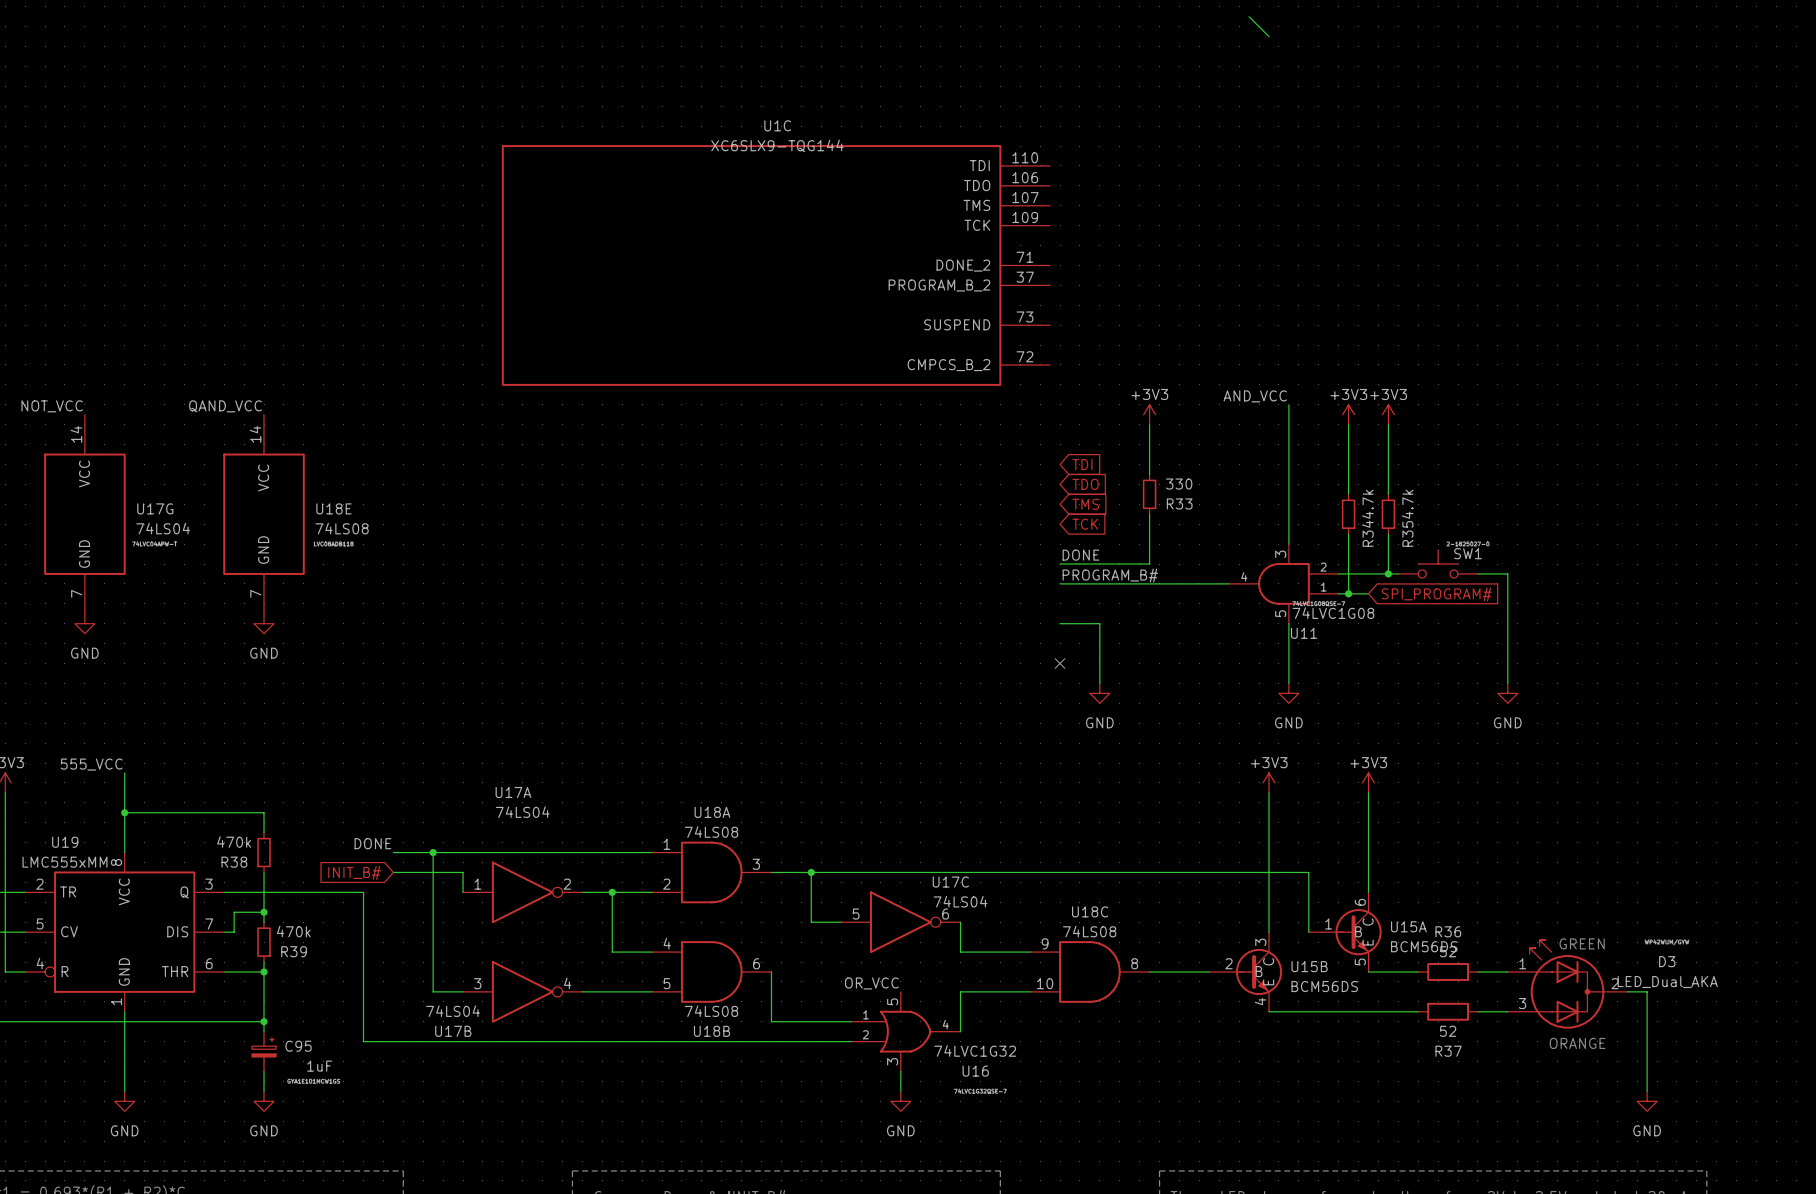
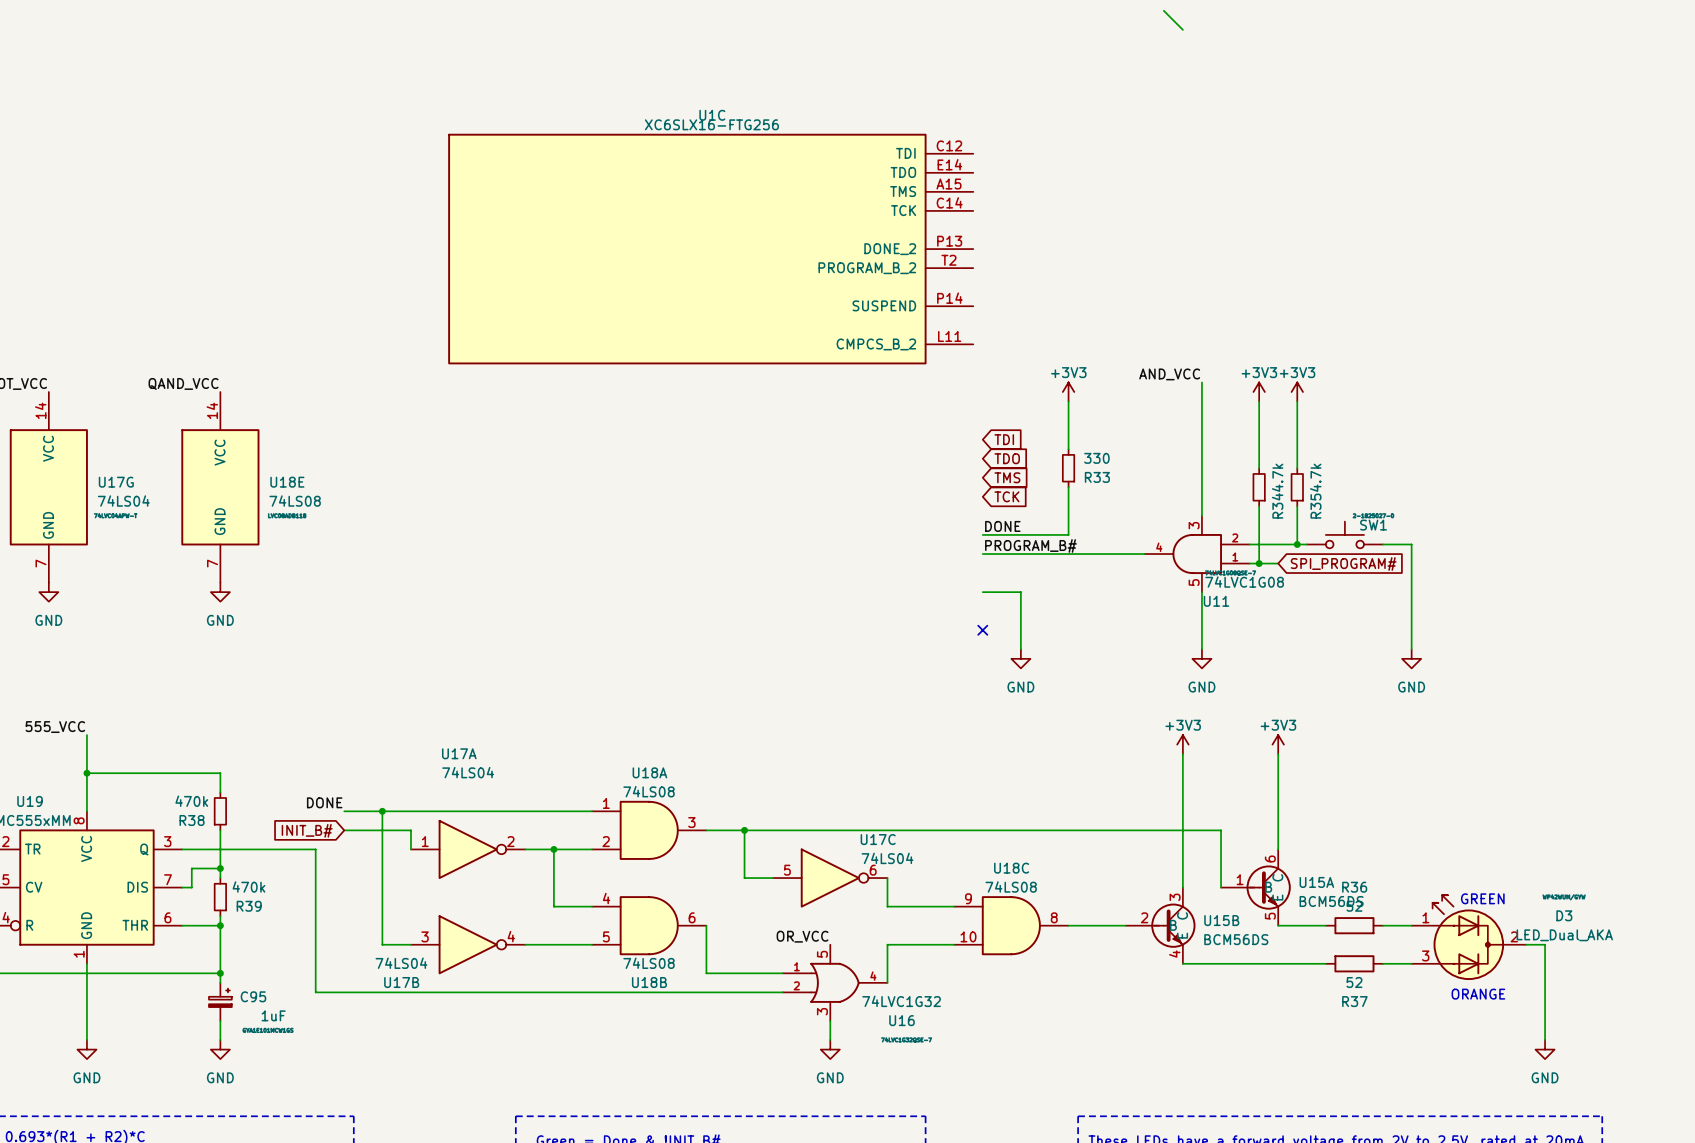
U1C value: XC6SLX9-TQG144 (777, 145) -> XC6SLX16-FTG256 (711, 124)
U1C pin number: 110 (1025, 157) -> C12 (949, 145)
U1C pin number: 106 (1025, 177) -> E14 (949, 164)
U1C pin number: 107 (1025, 197) -> A15 (948, 184)
U1C pin number: 109 (1025, 217) -> C14 (949, 202)
U1C pin number: 71 (1024, 257) -> P13 (949, 241)
U1C pin number: 37 (1025, 277) -> T2 (948, 260)
U1C pin number: 73 (1024, 316) -> P14 (949, 298)
U1C pin number: 72 (1024, 356) -> L11 (949, 336)

